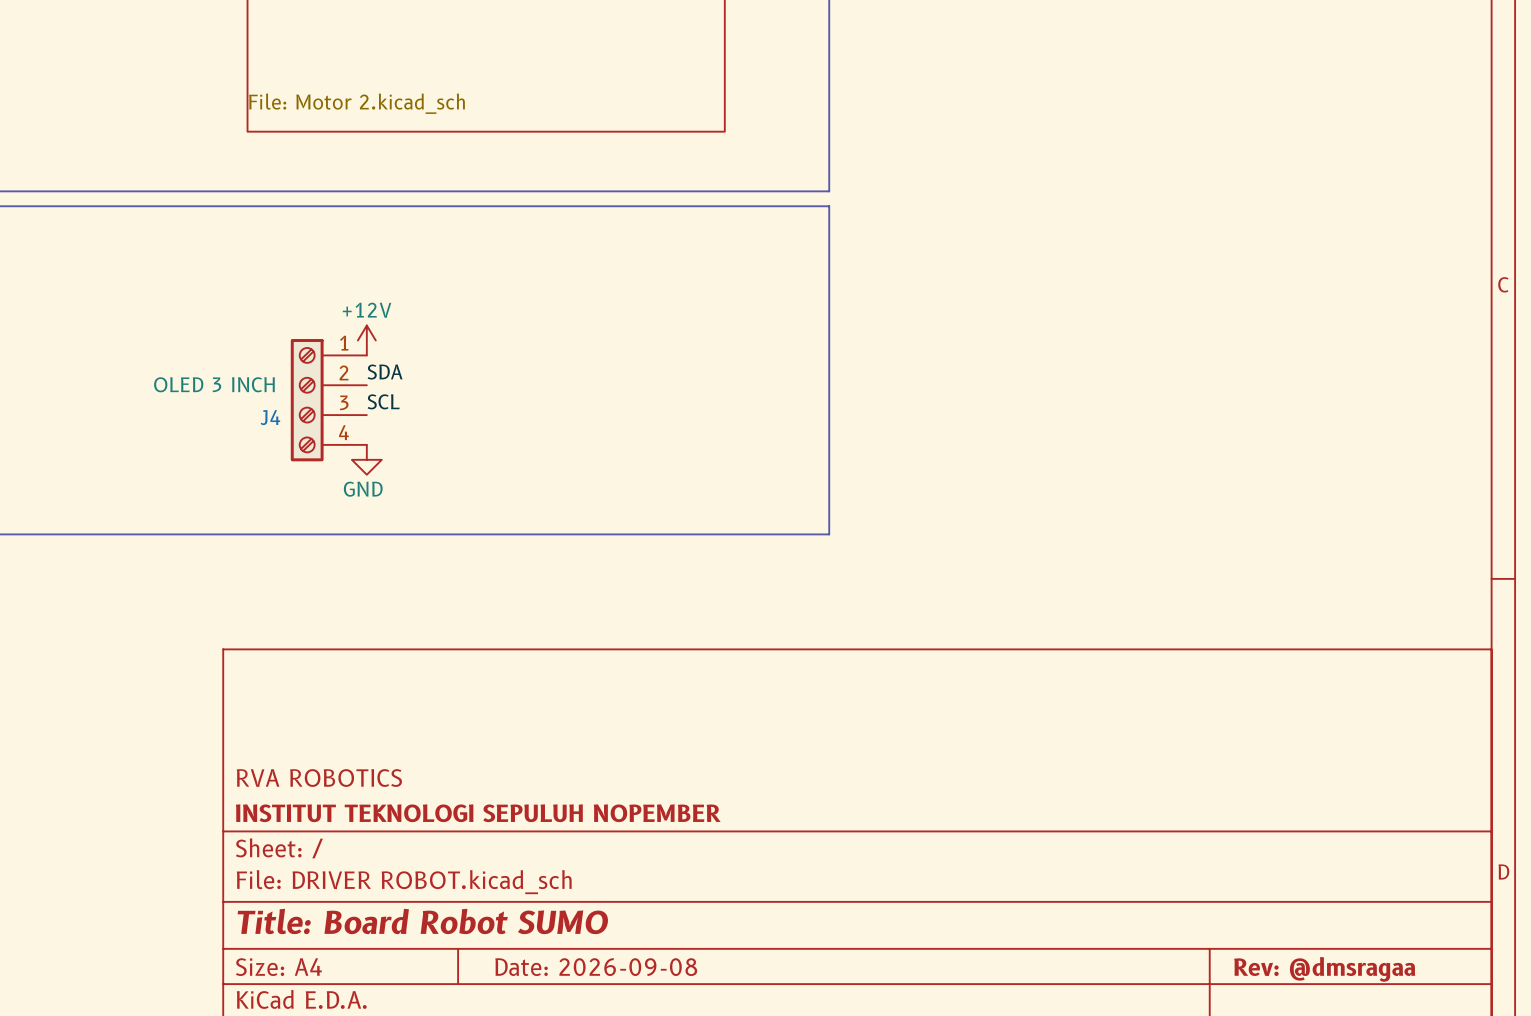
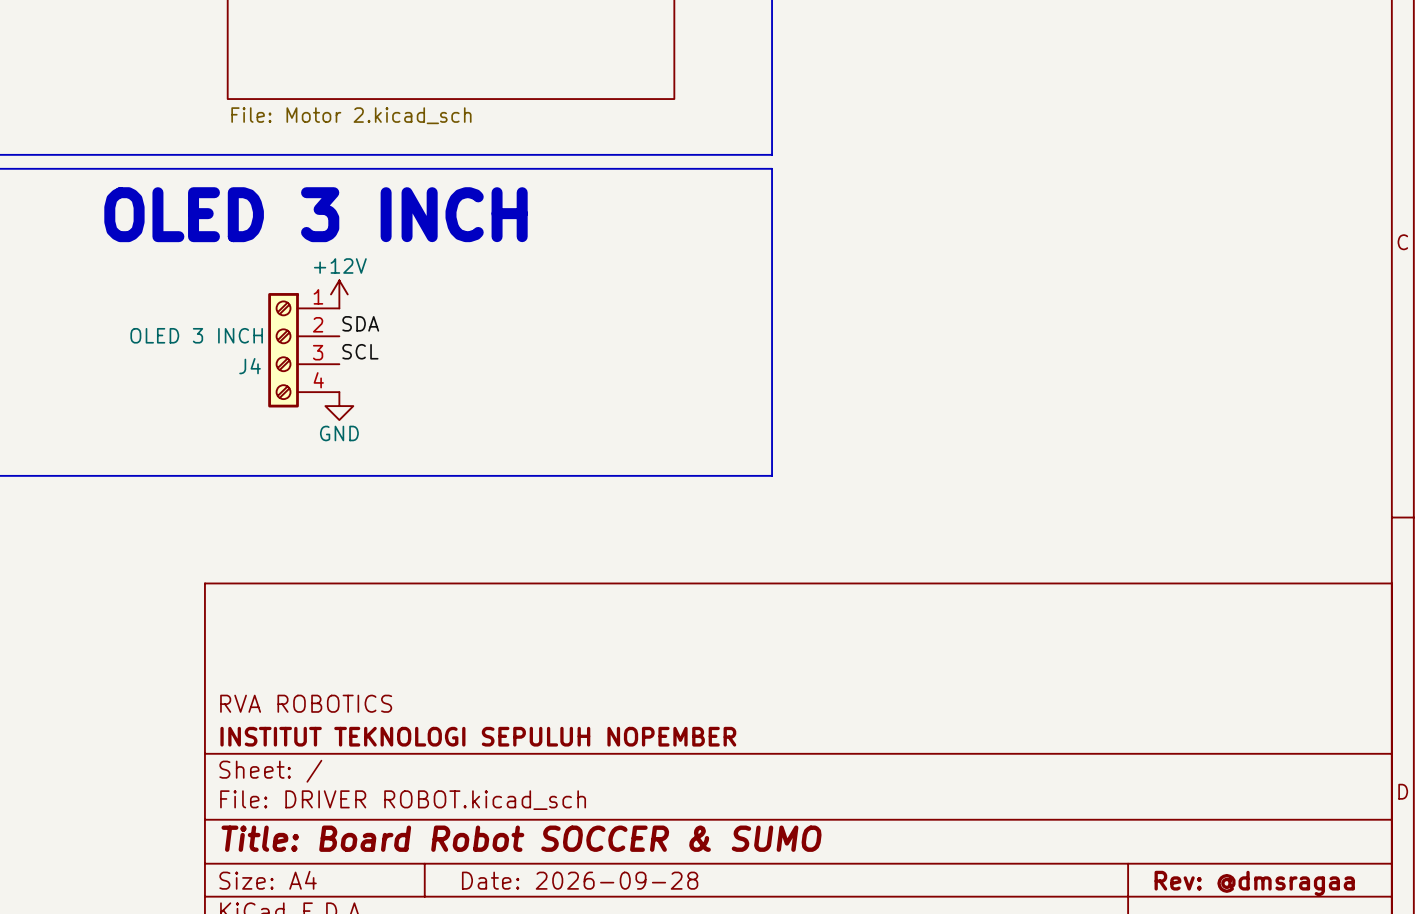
sheet value position: File: Motor 2.kicad_sch (356, 103) -> File: Motor 2.kicad_sch (351, 115)
text: none -> OLED 3 INCH (315, 214)
title block: Title: Board Robot SUMO (422, 921) -> Title: Board Robot SOCCER & SUMO (521, 838)
title block: Date: 2026-09-08 (596, 967) -> Date: 2026-09-28 (580, 880)

